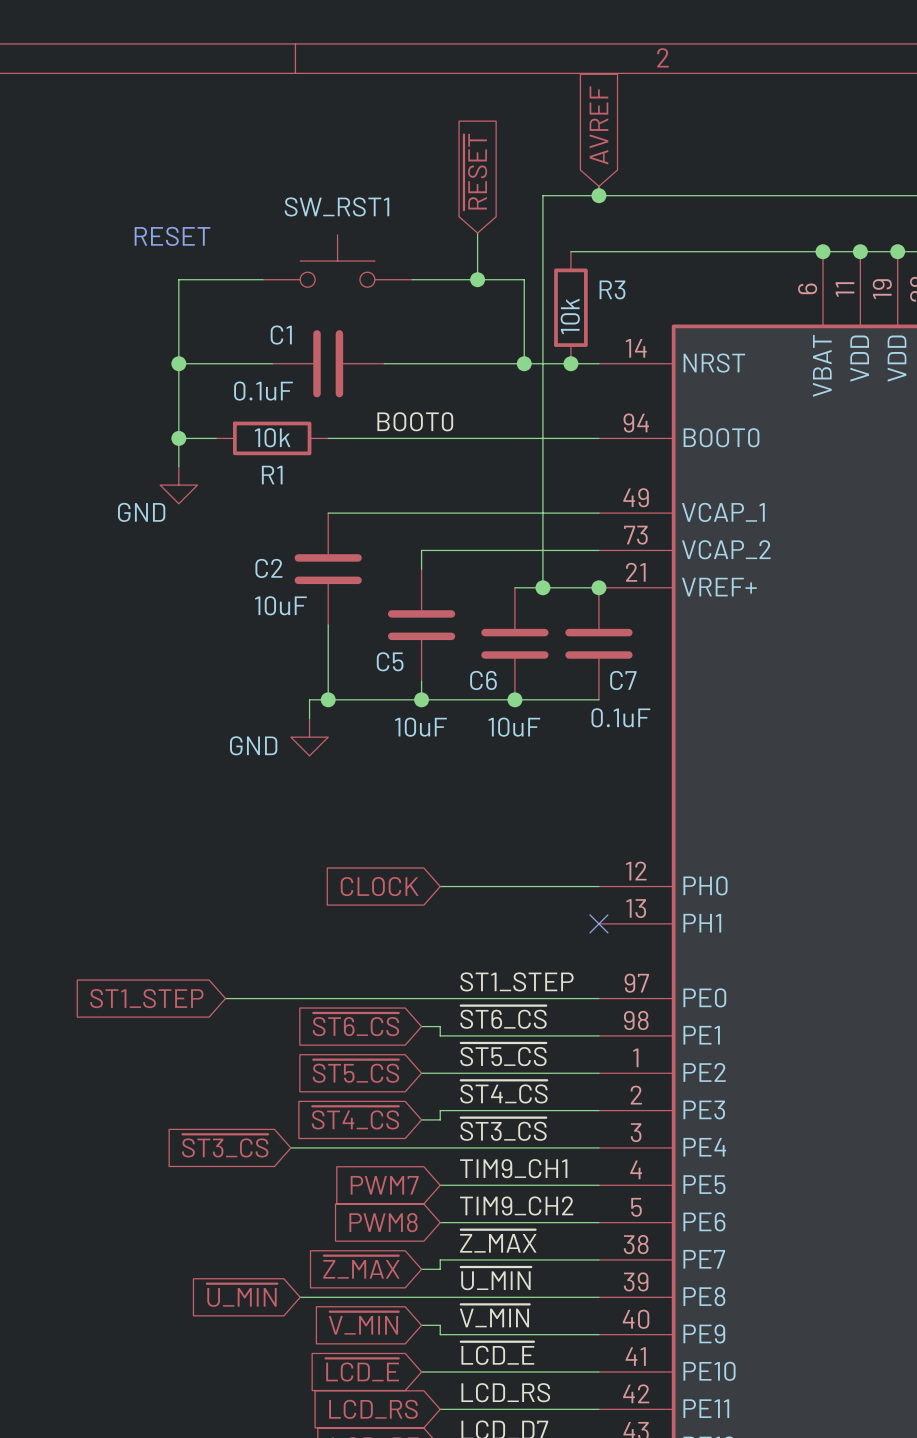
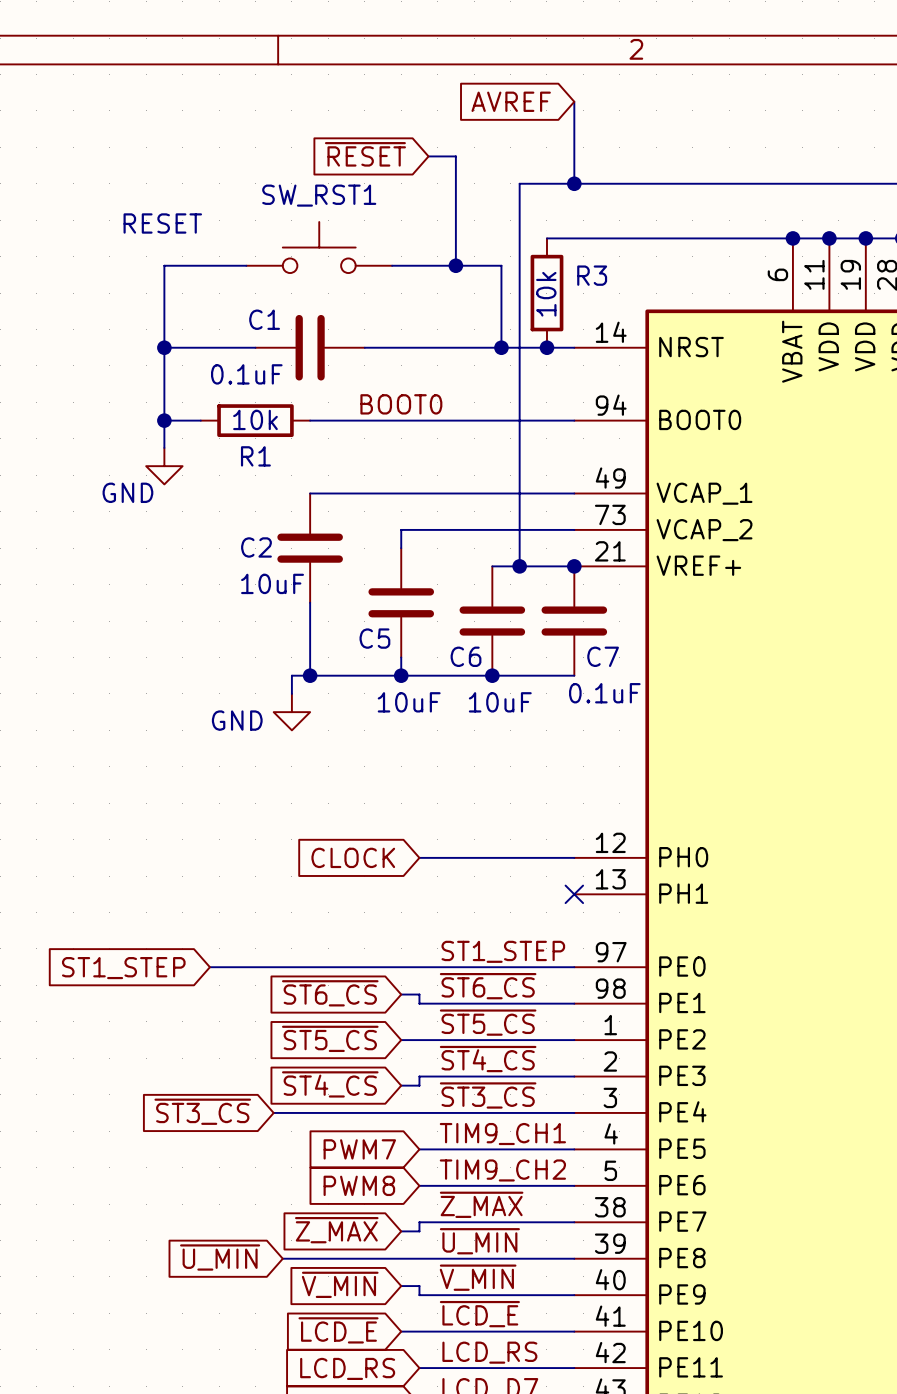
wire: none -> (574, 101) (574, 174)
global label rotation: 0° (598, 125) -> 90° counterclockwise (511, 101)
wire: none -> (428, 156) (455, 156) (455, 220)
global label rotation: 0° (475, 171) -> 90° counterclockwise (365, 154)

